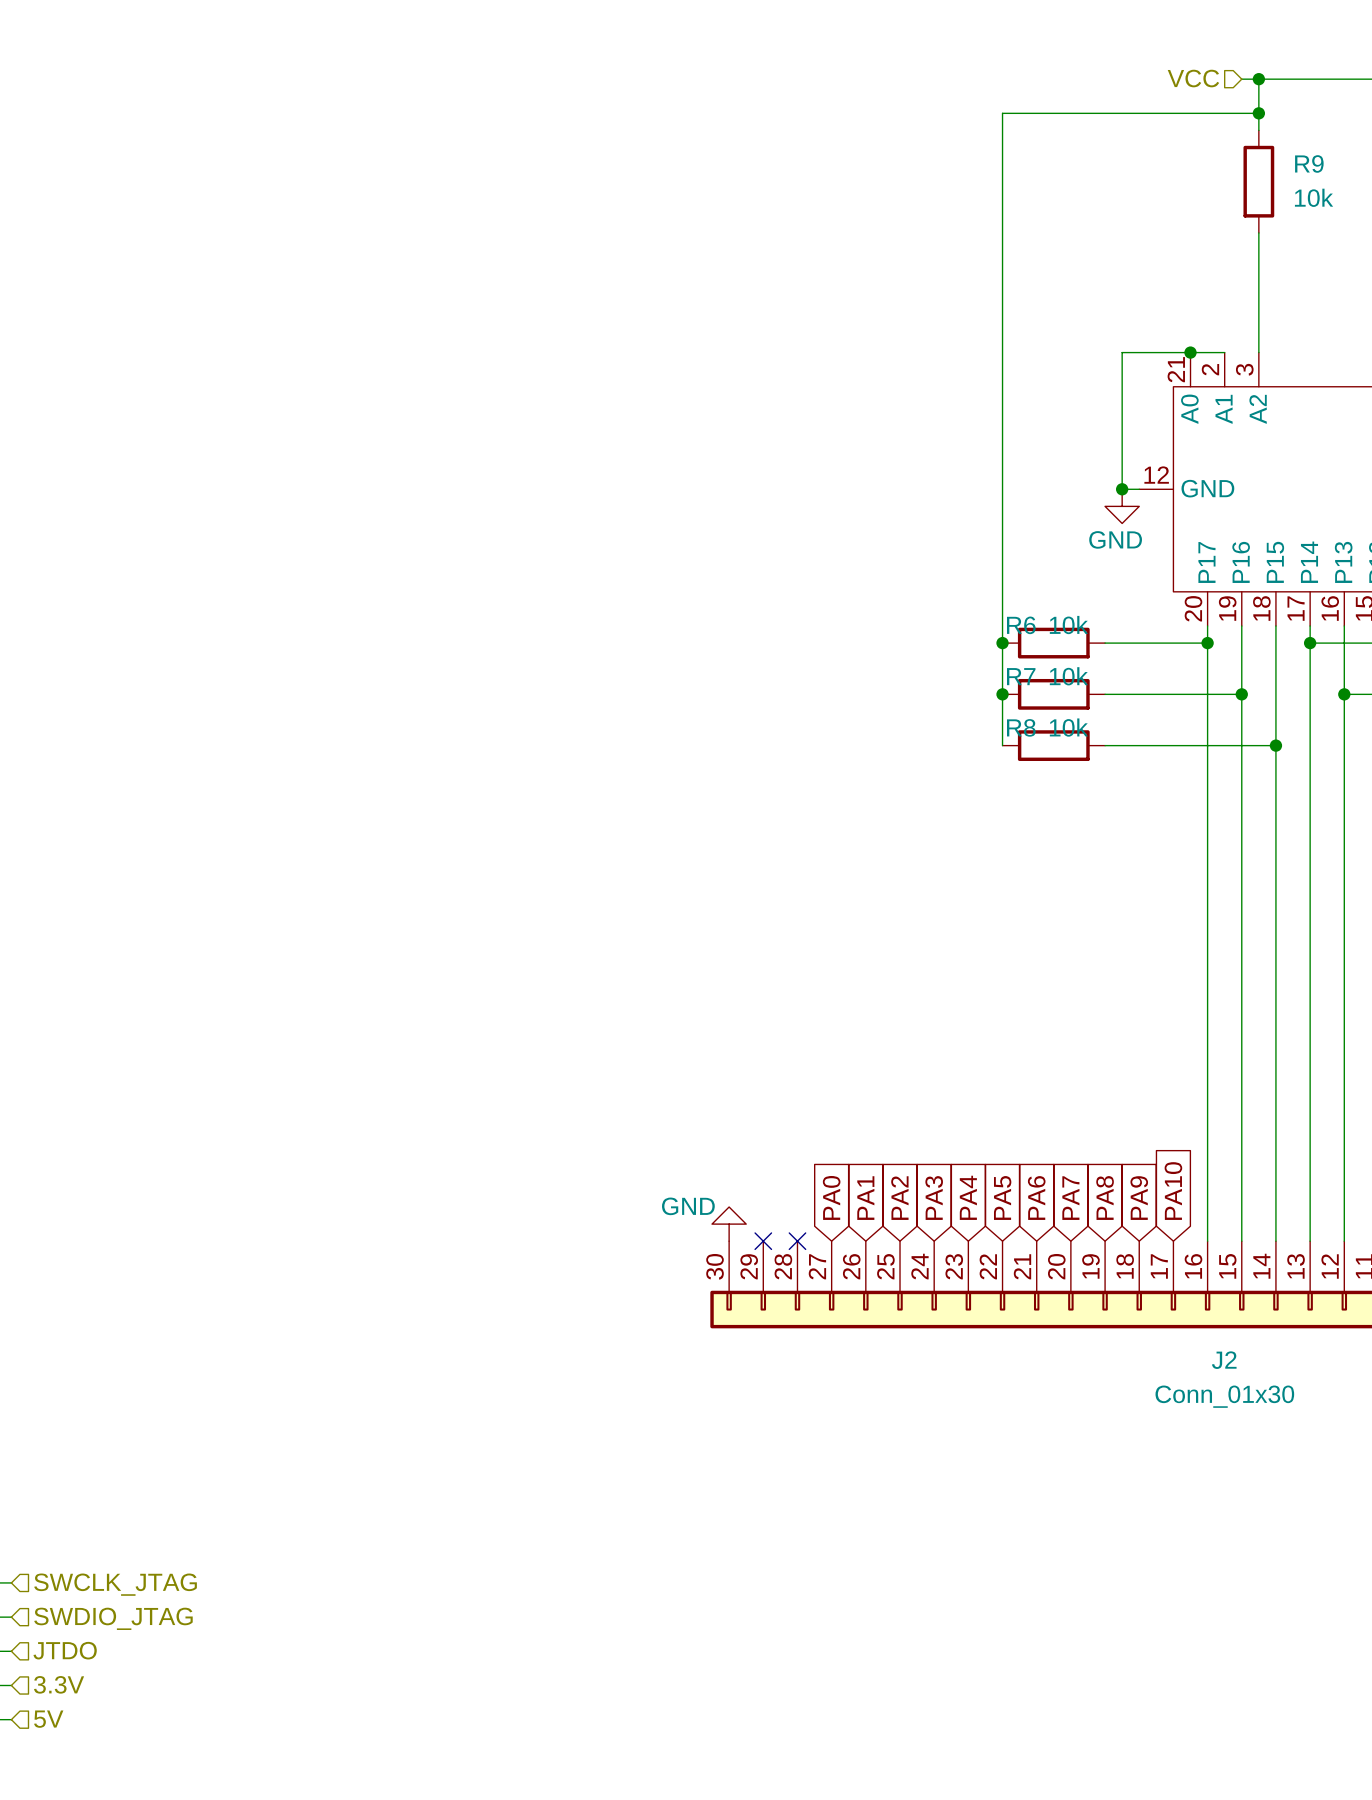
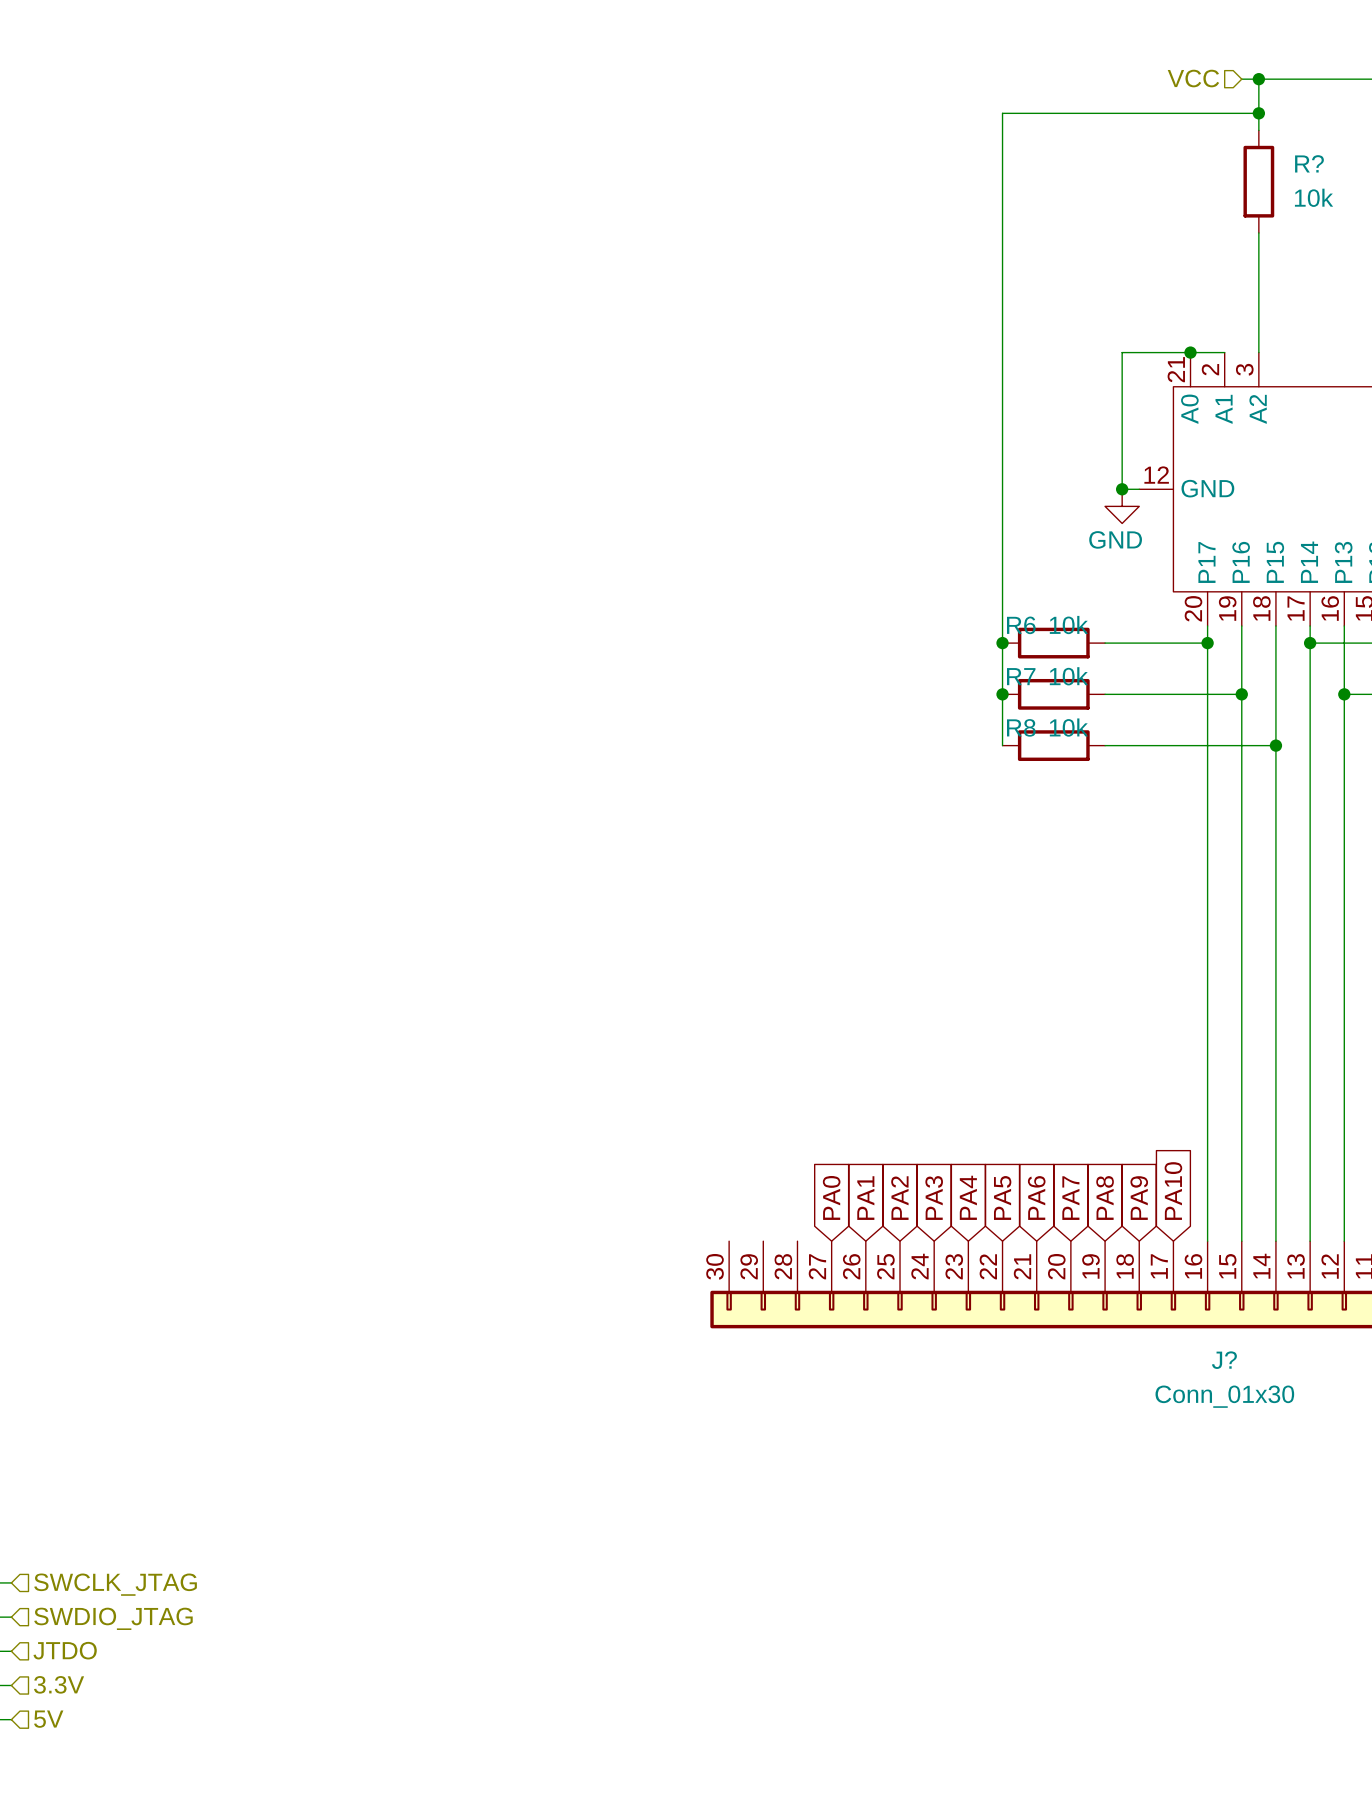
R9 name: R9 (1309, 163) -> R? (1309, 163)
power symbol: GND (729, 1224) -> none
no-connect mark: (763, 1241) -> none
no-connect mark: (797, 1241) -> none
J2 name: J2 (1224, 1360) -> J? (1224, 1360)

